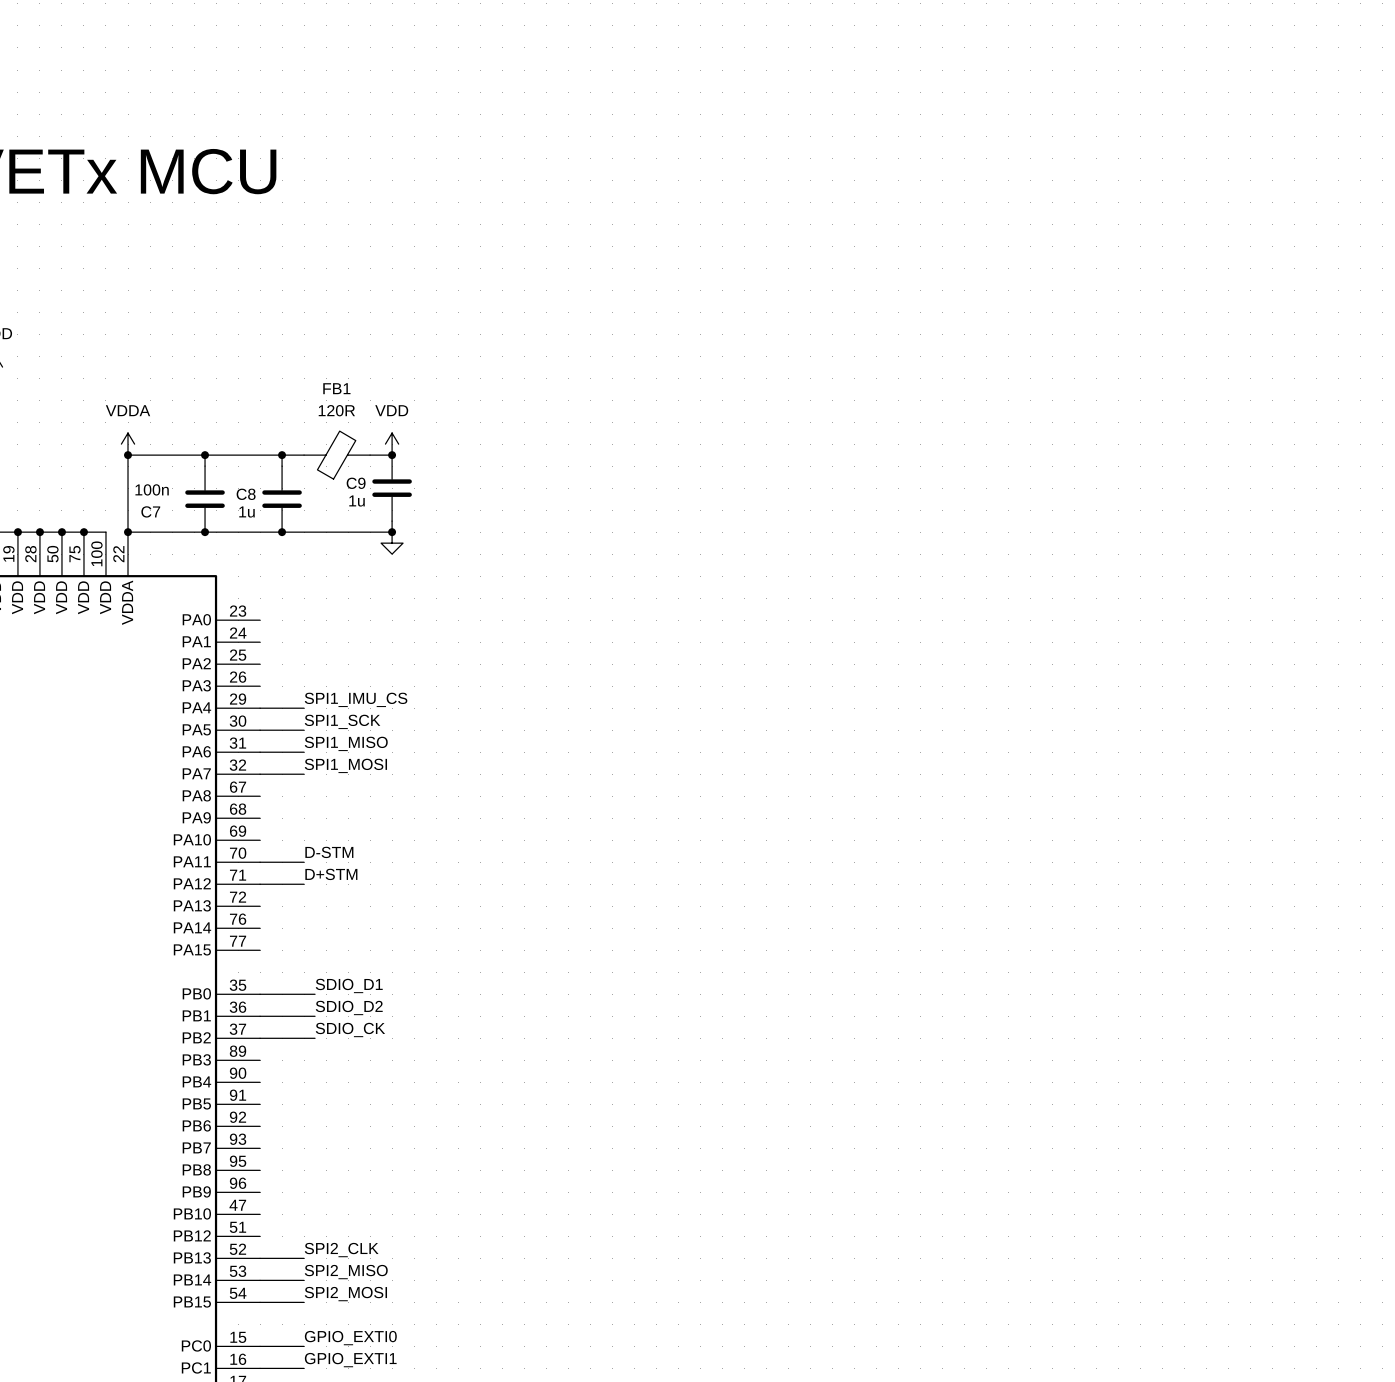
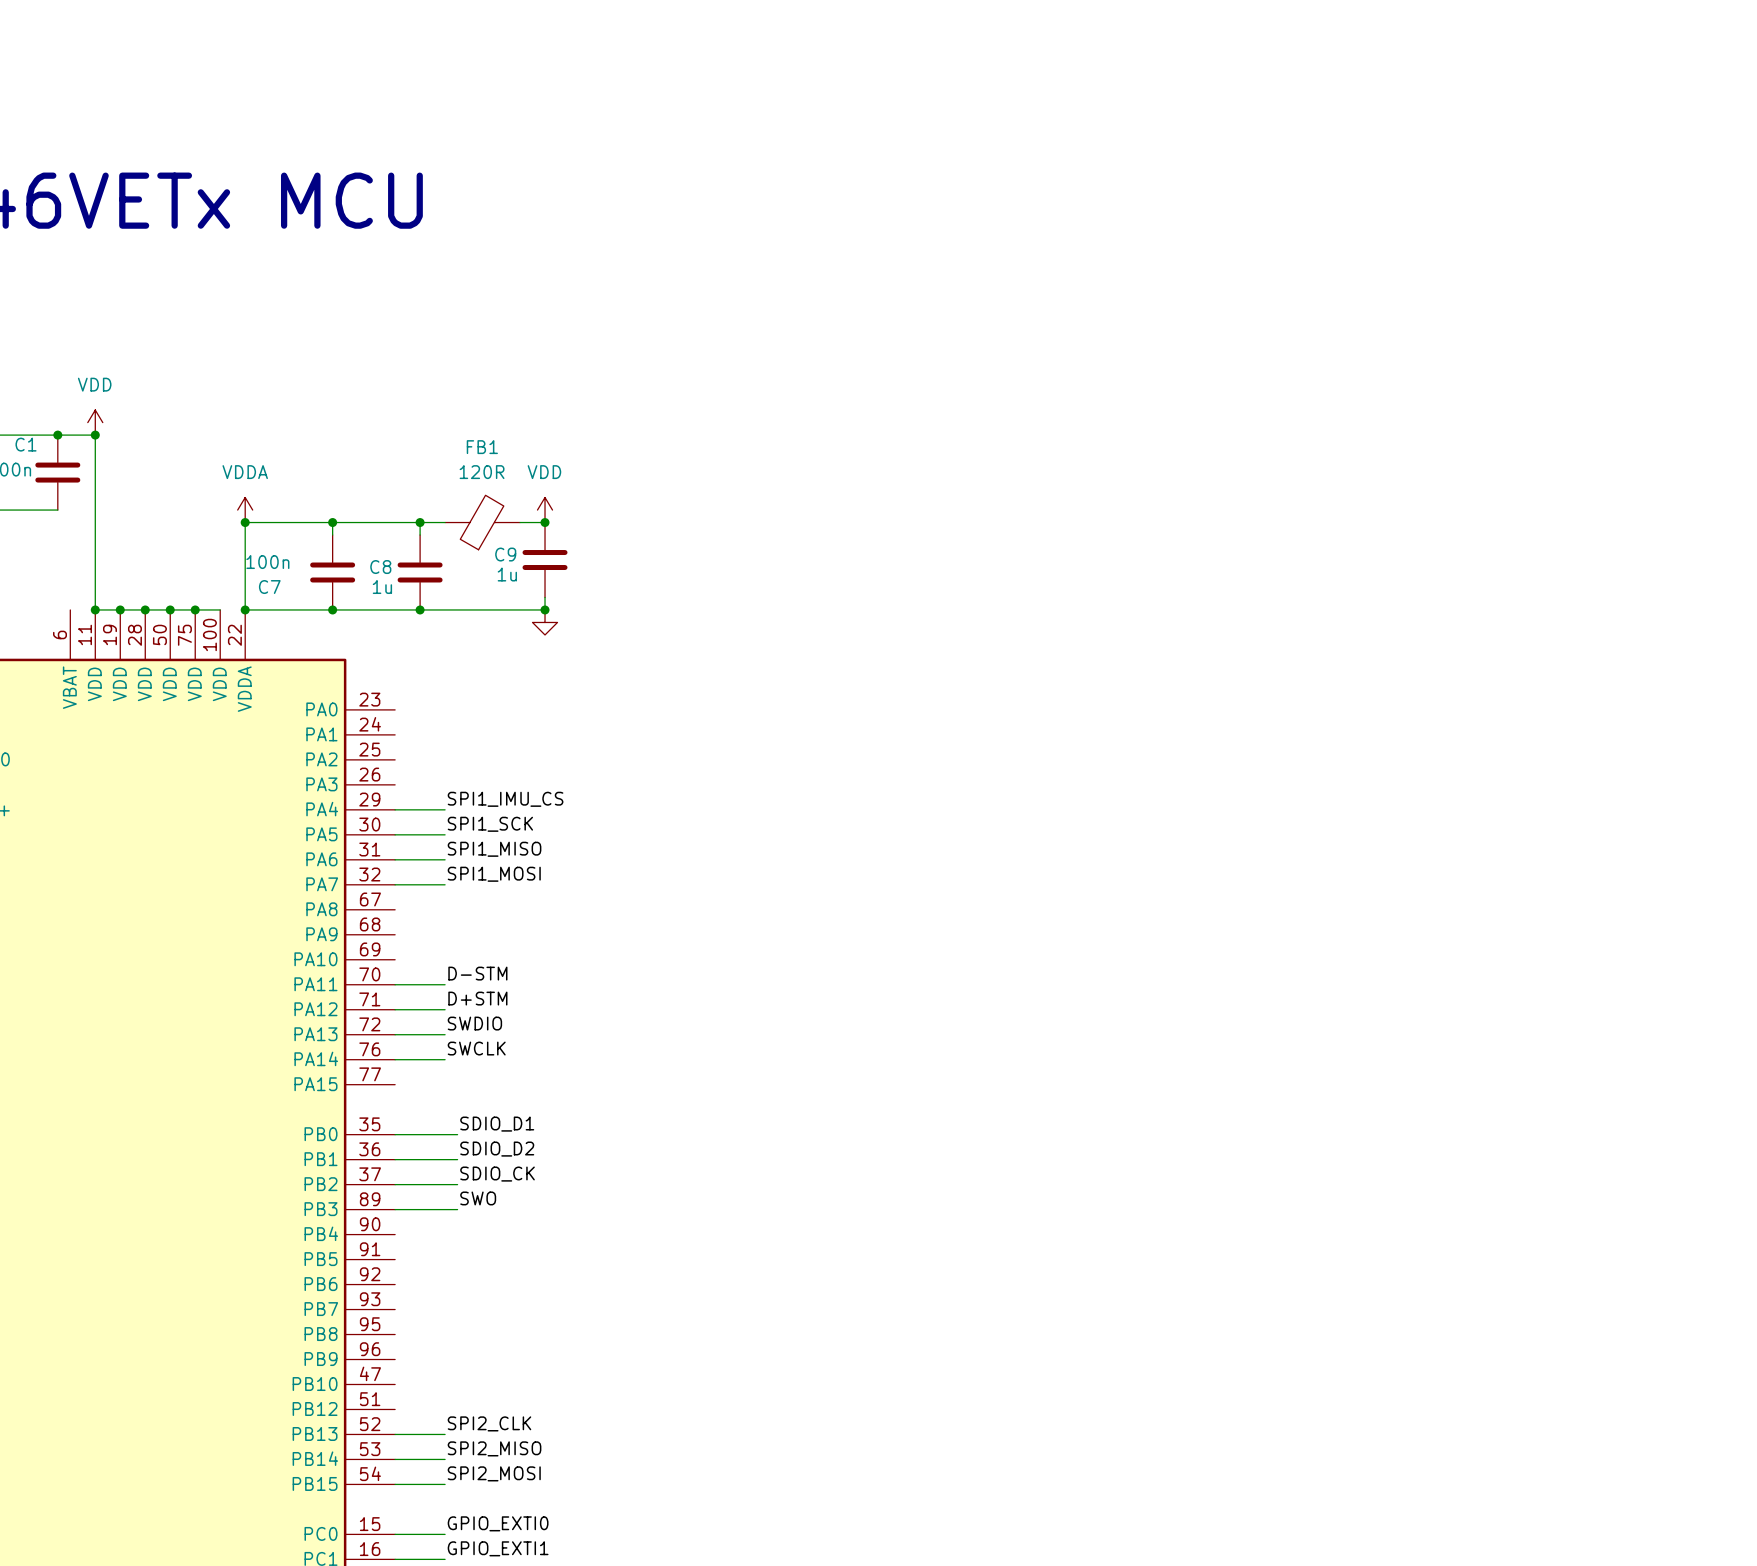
label: none -> SWDIO (474, 1023)
wire: none -> (395, 1034) (445, 1034)
label: none -> SWCLK (476, 1048)
wire: none -> (395, 1059) (445, 1059)
label: none -> SWO (478, 1198)
wire: none -> (395, 1209) (457, 1209)

